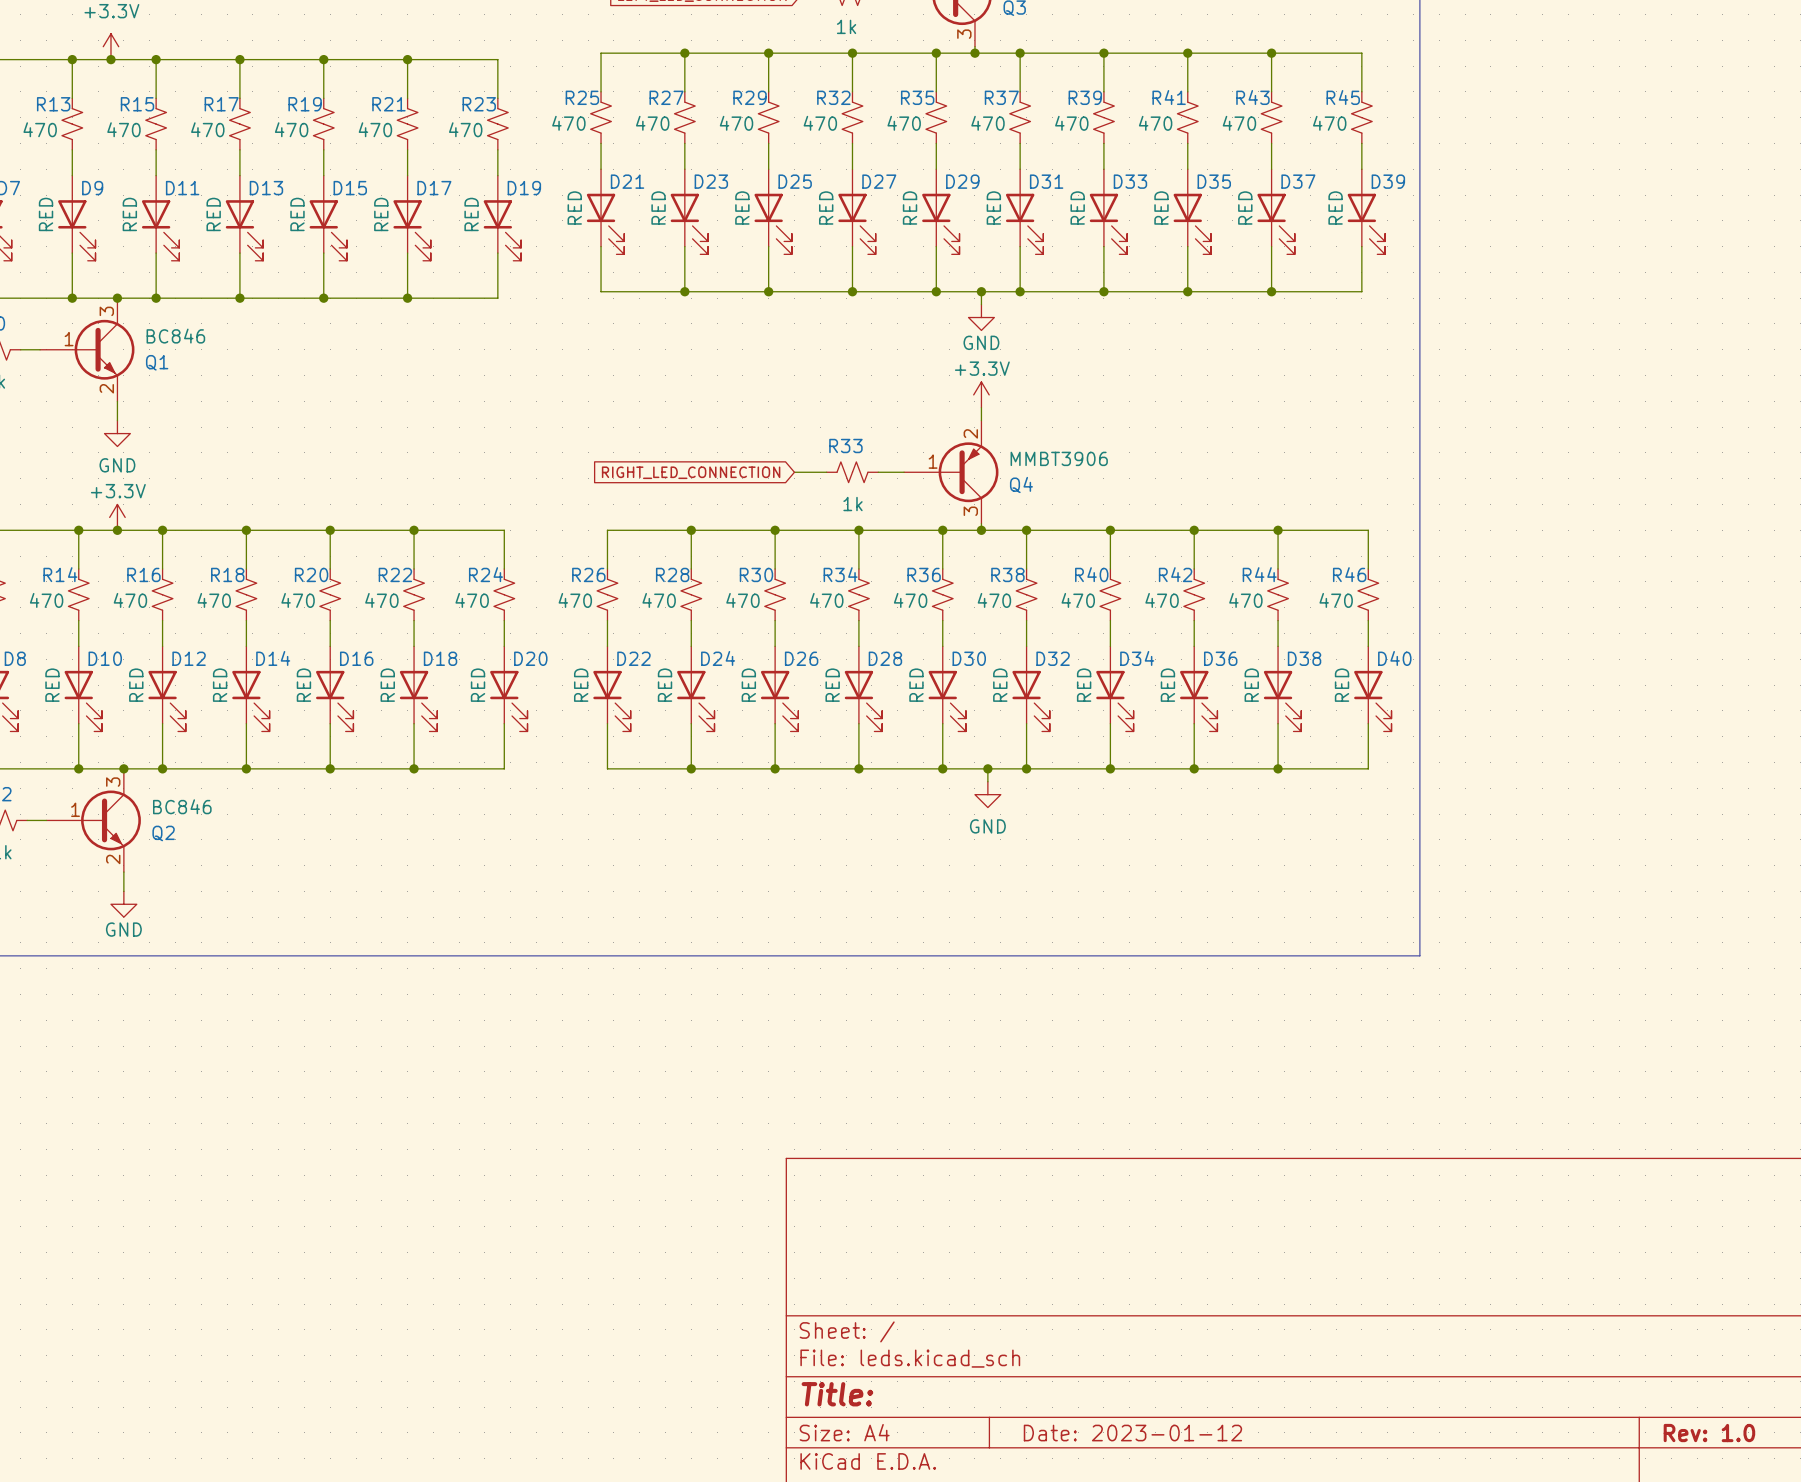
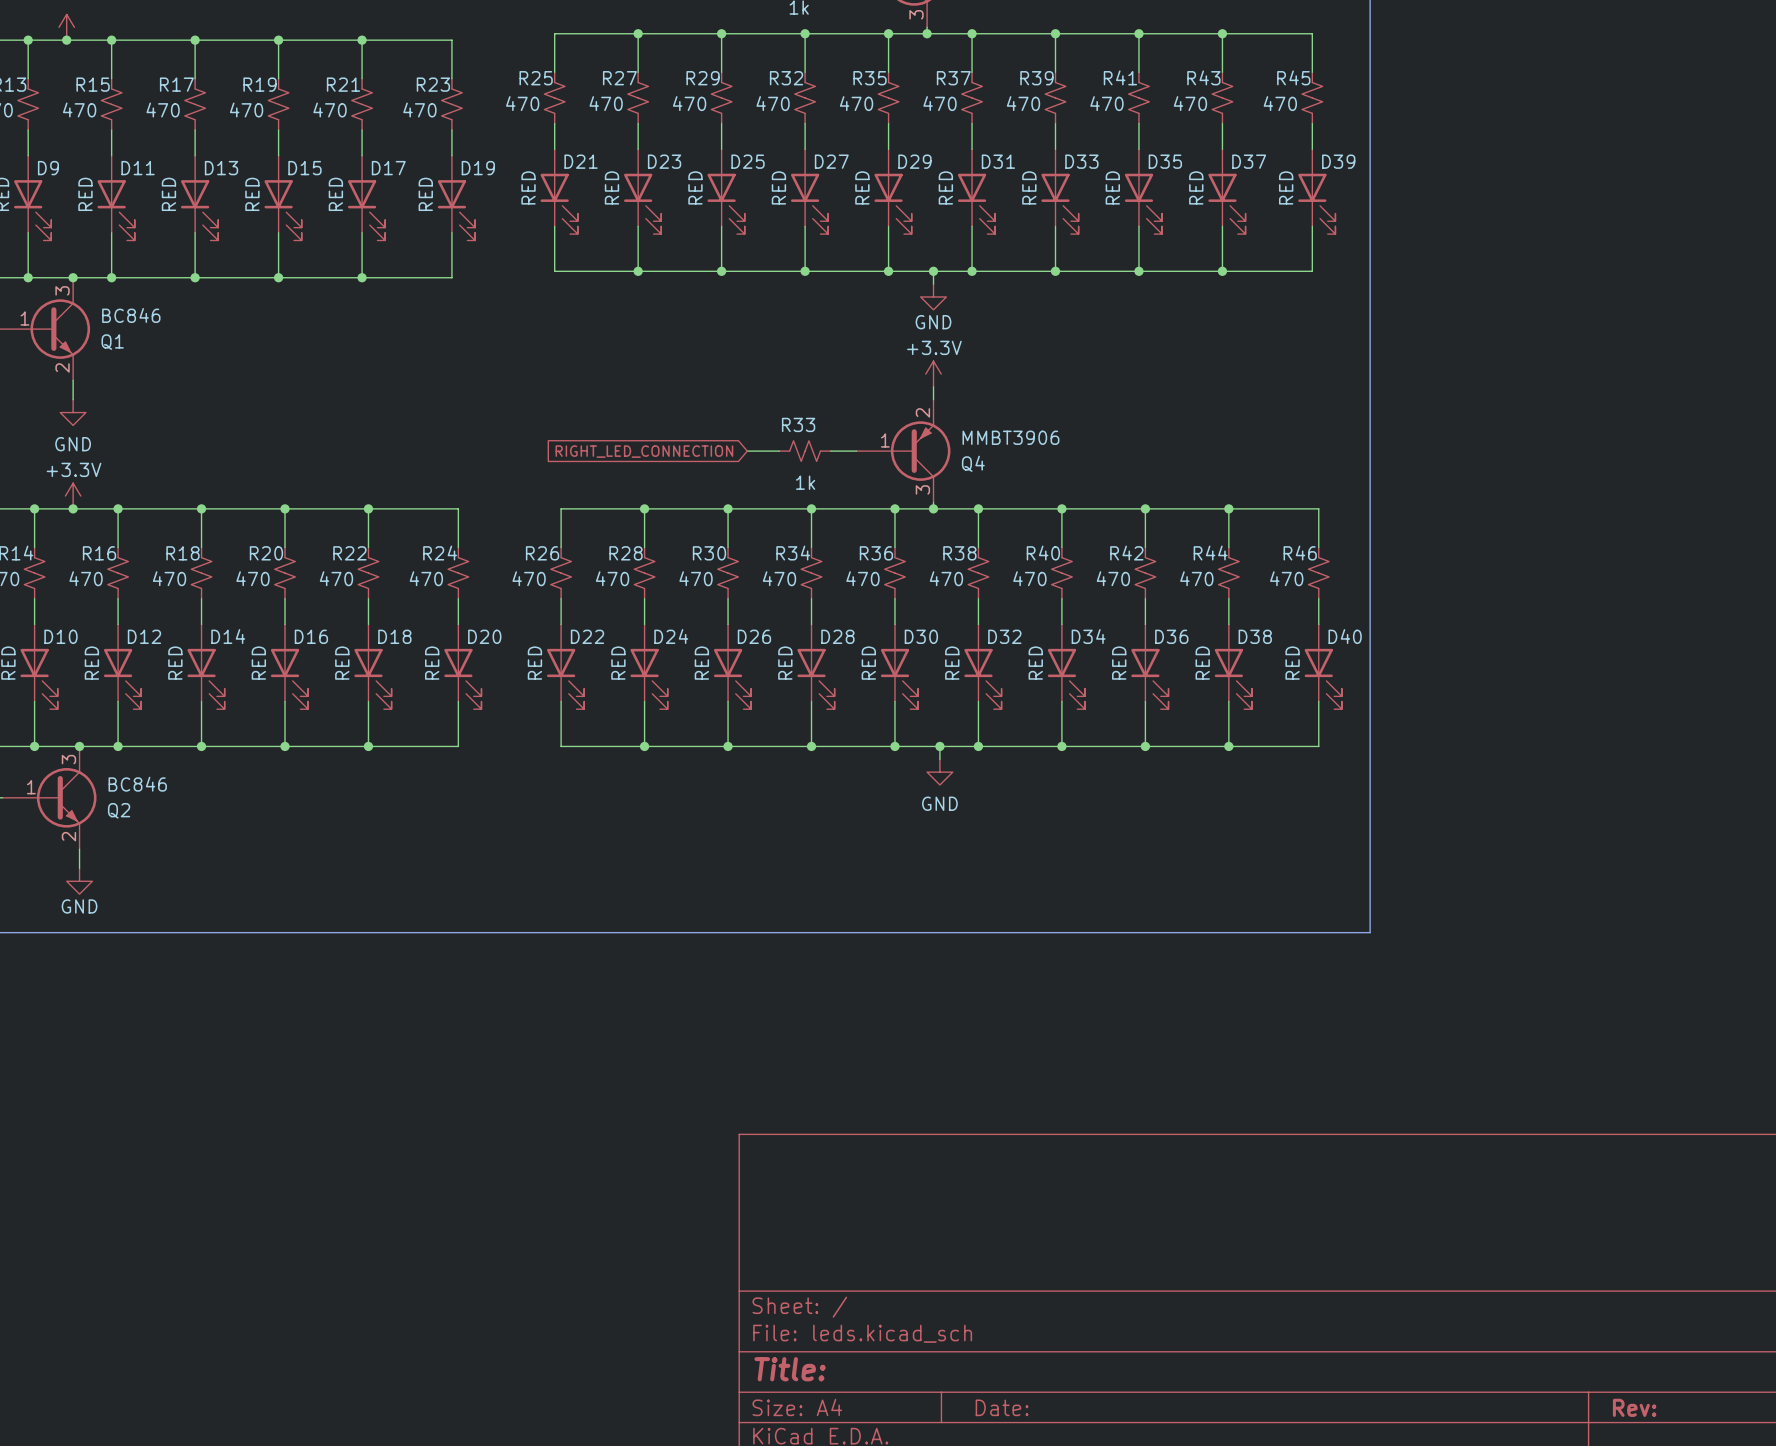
title block: Date: 2023-01-12 (1132, 1433) -> Date: (1002, 1407)
title block: Rev: 1.0 (1709, 1433) -> Rev: (1634, 1407)

